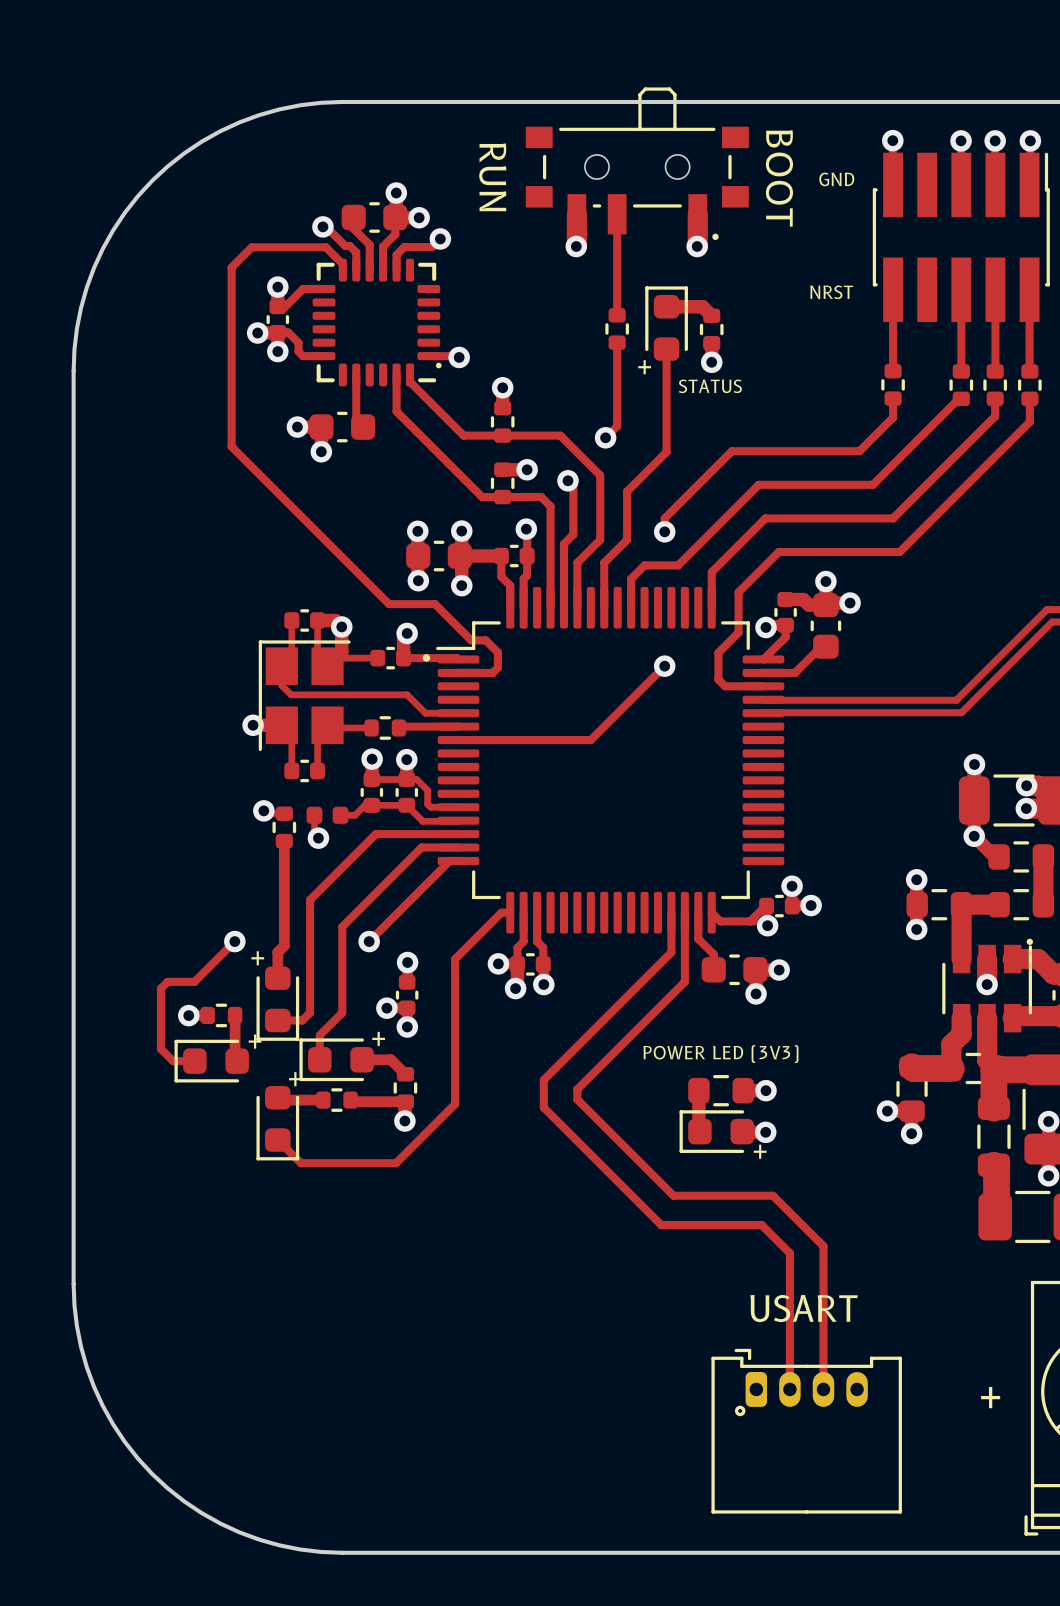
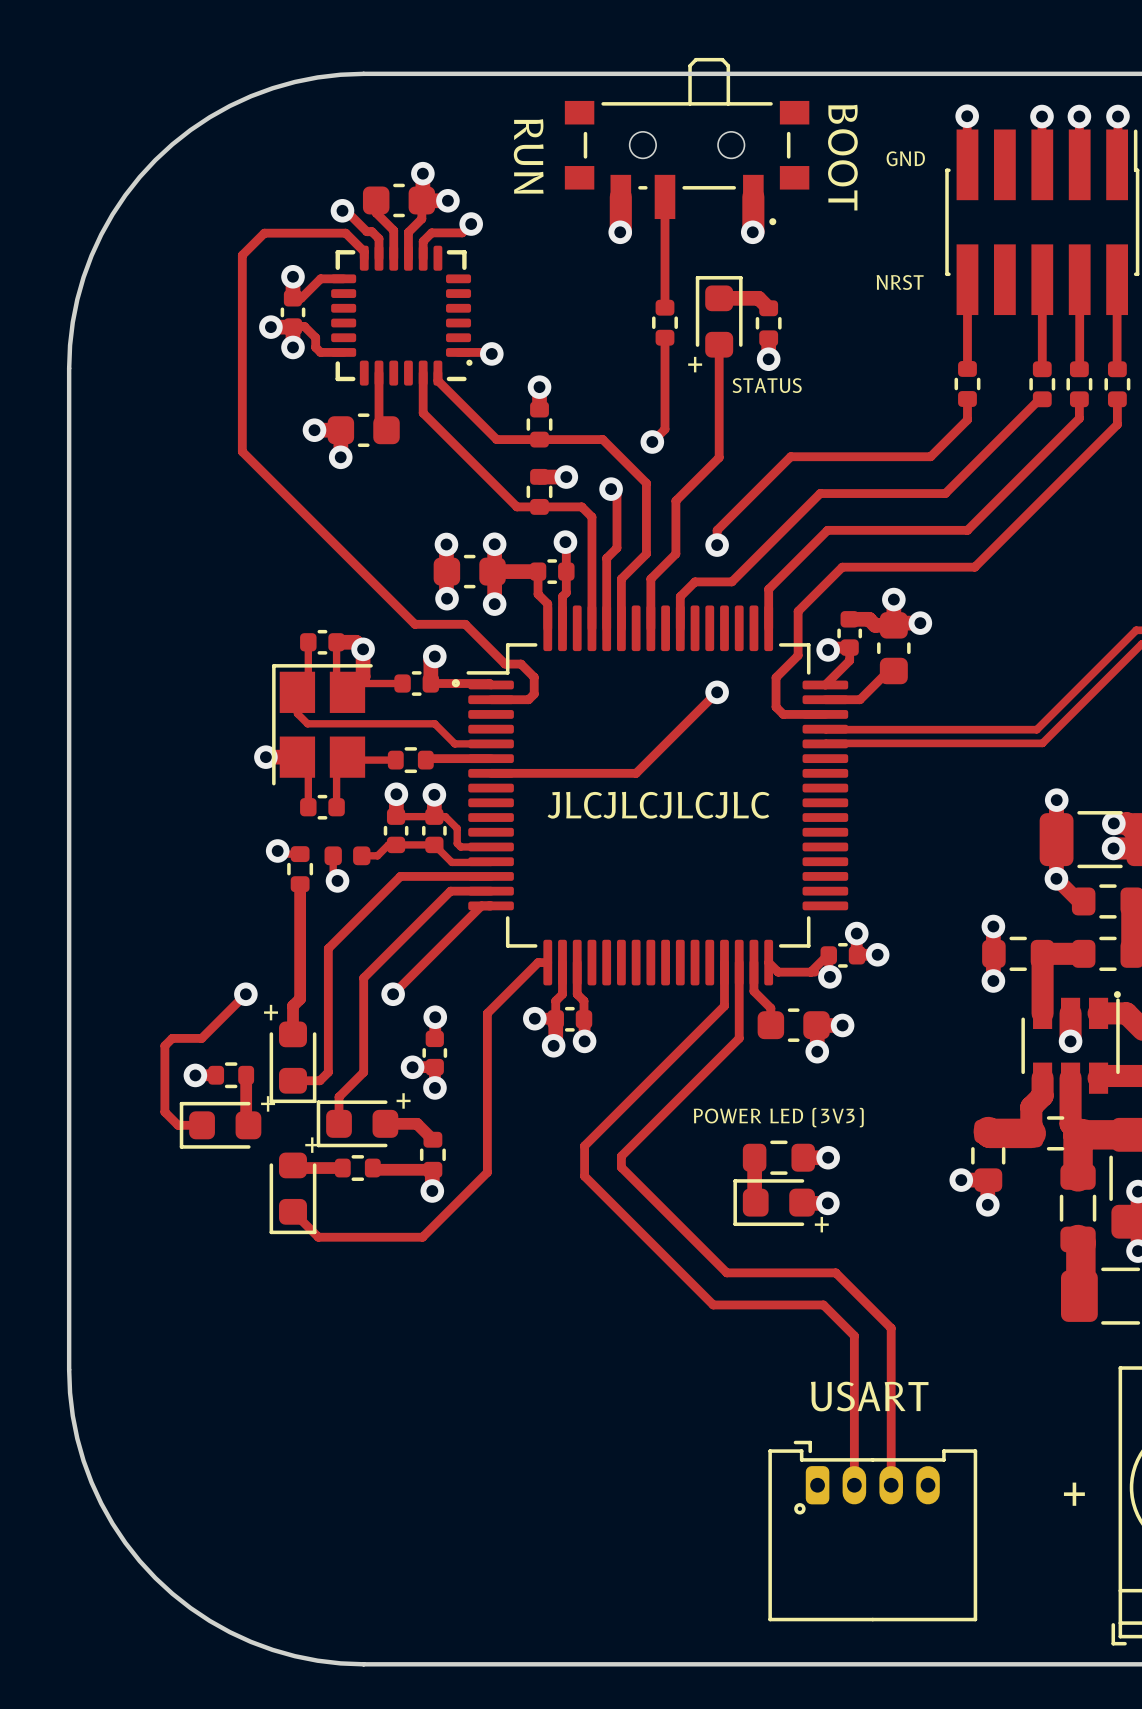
text: none -> JLCJLCJLCJLC (658, 805)

